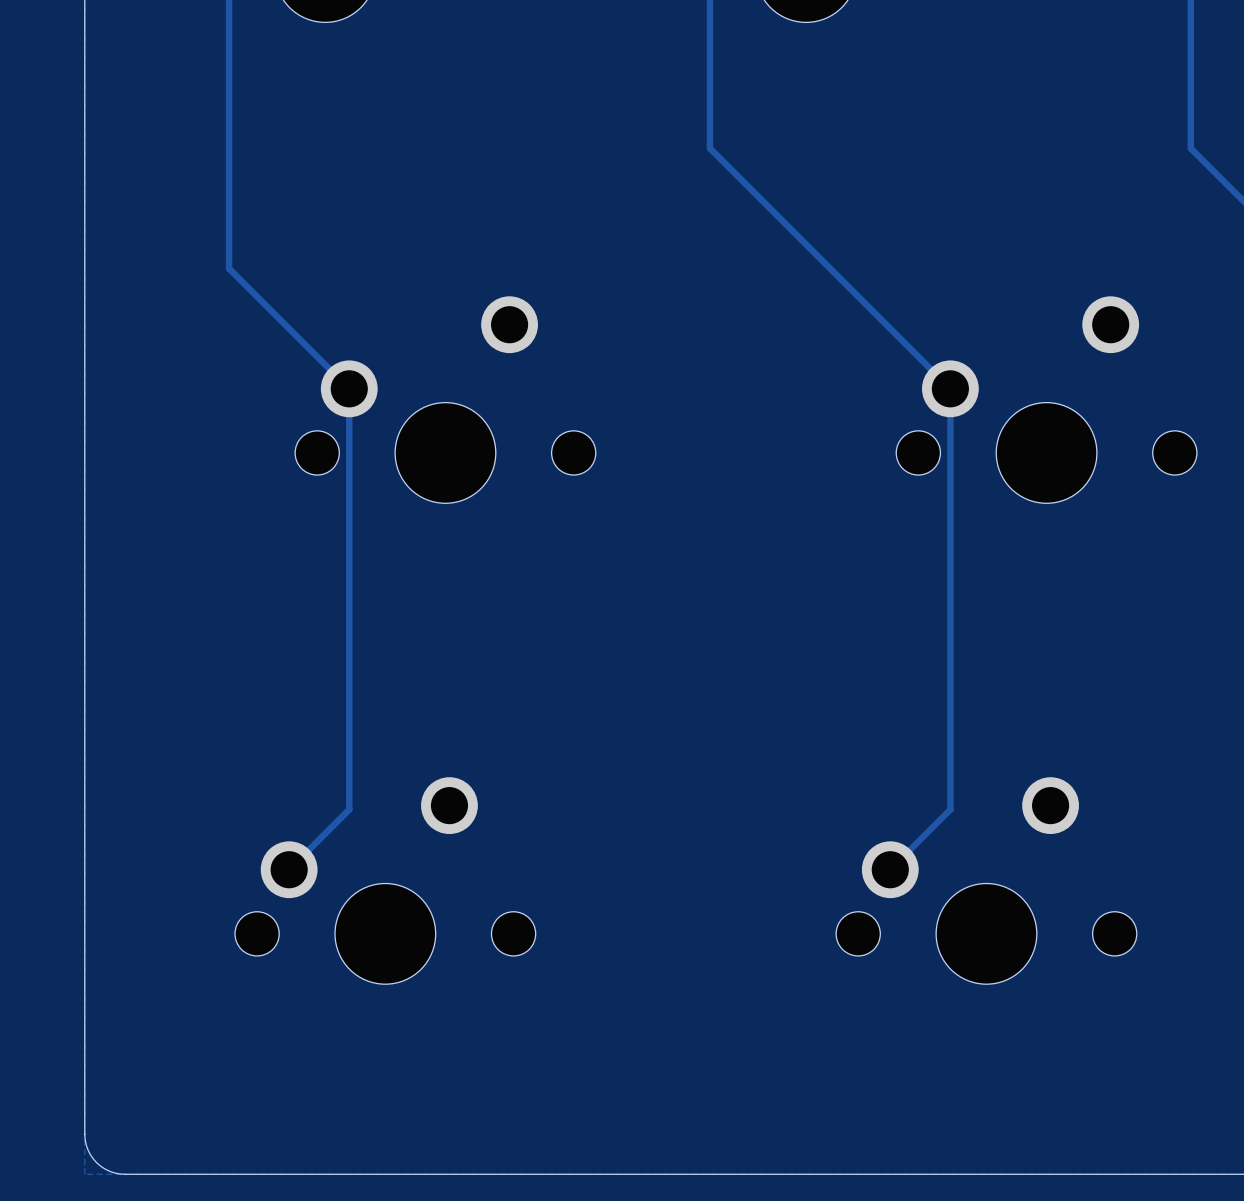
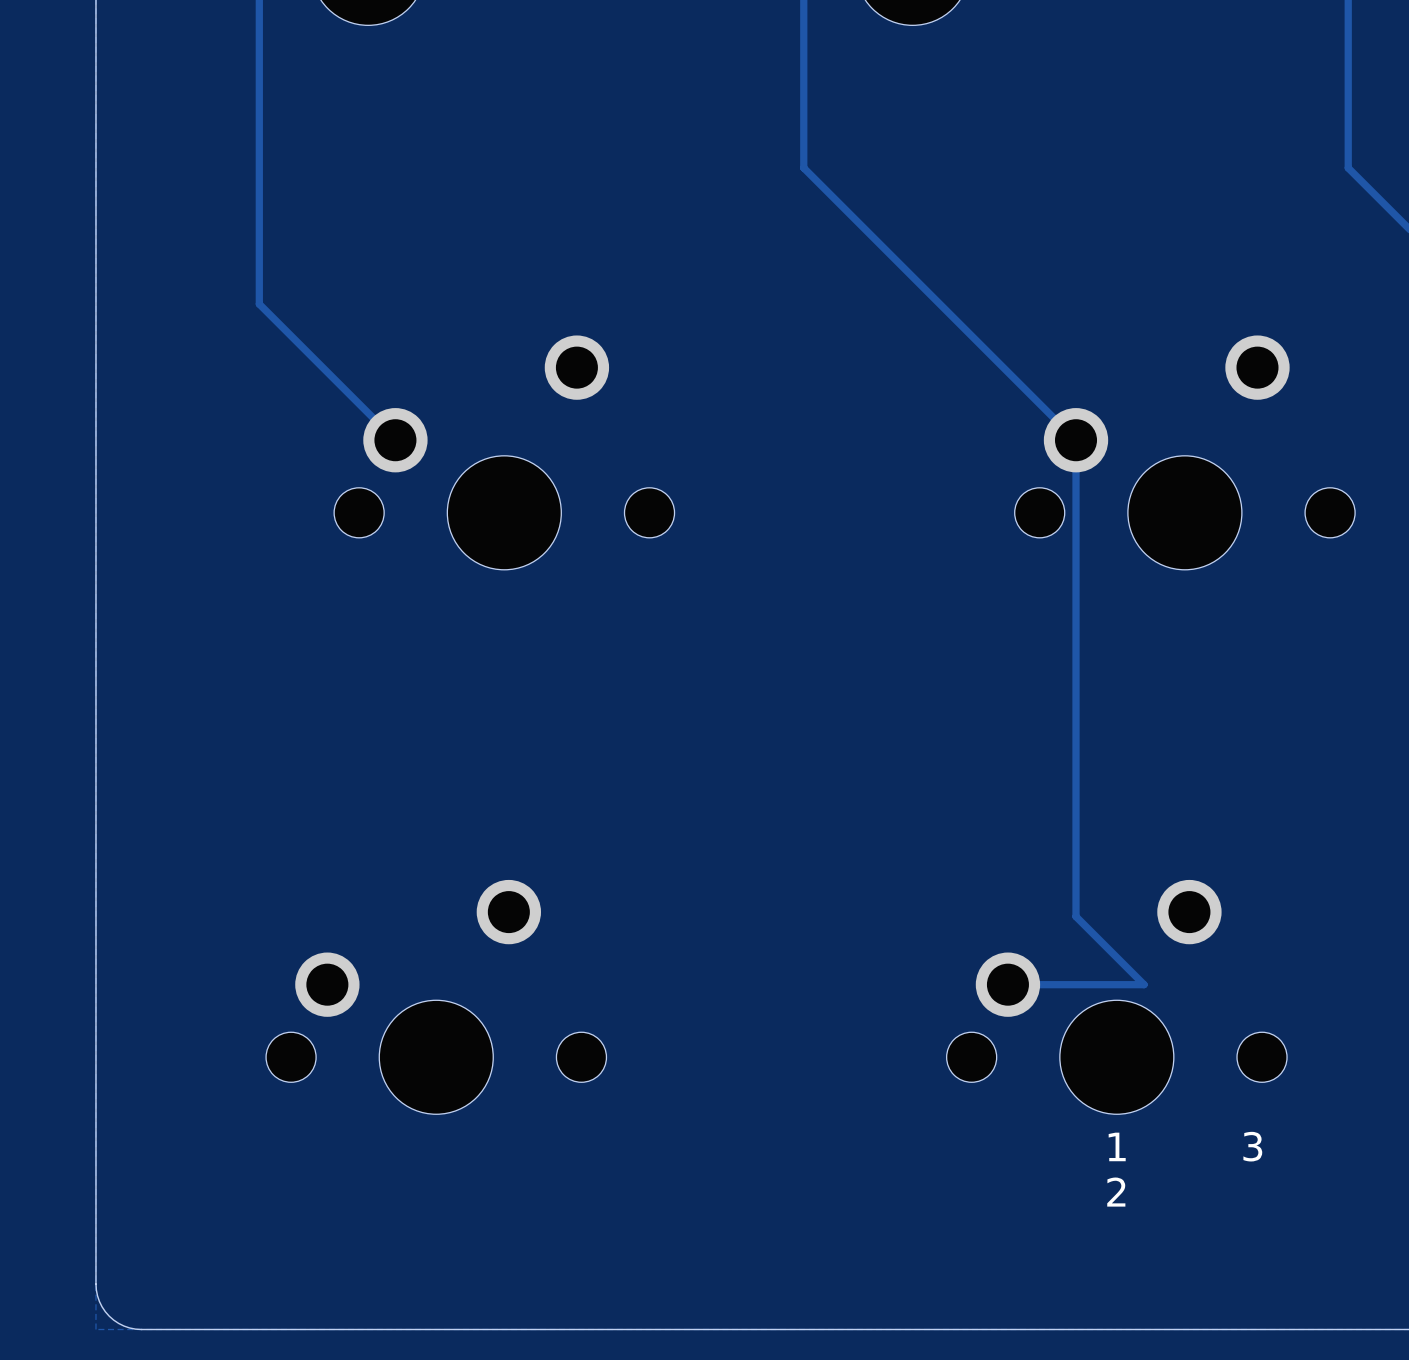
track: (349, 388) (349, 809) (289, 869) -> none
track: (950, 809) (890, 869) -> (1076, 916) (1144, 984) (1007, 984)
text: none -> 3 (1252, 1146)
text: none -> 1 (1117, 1146)
text: none -> 2 (1116, 1192)

